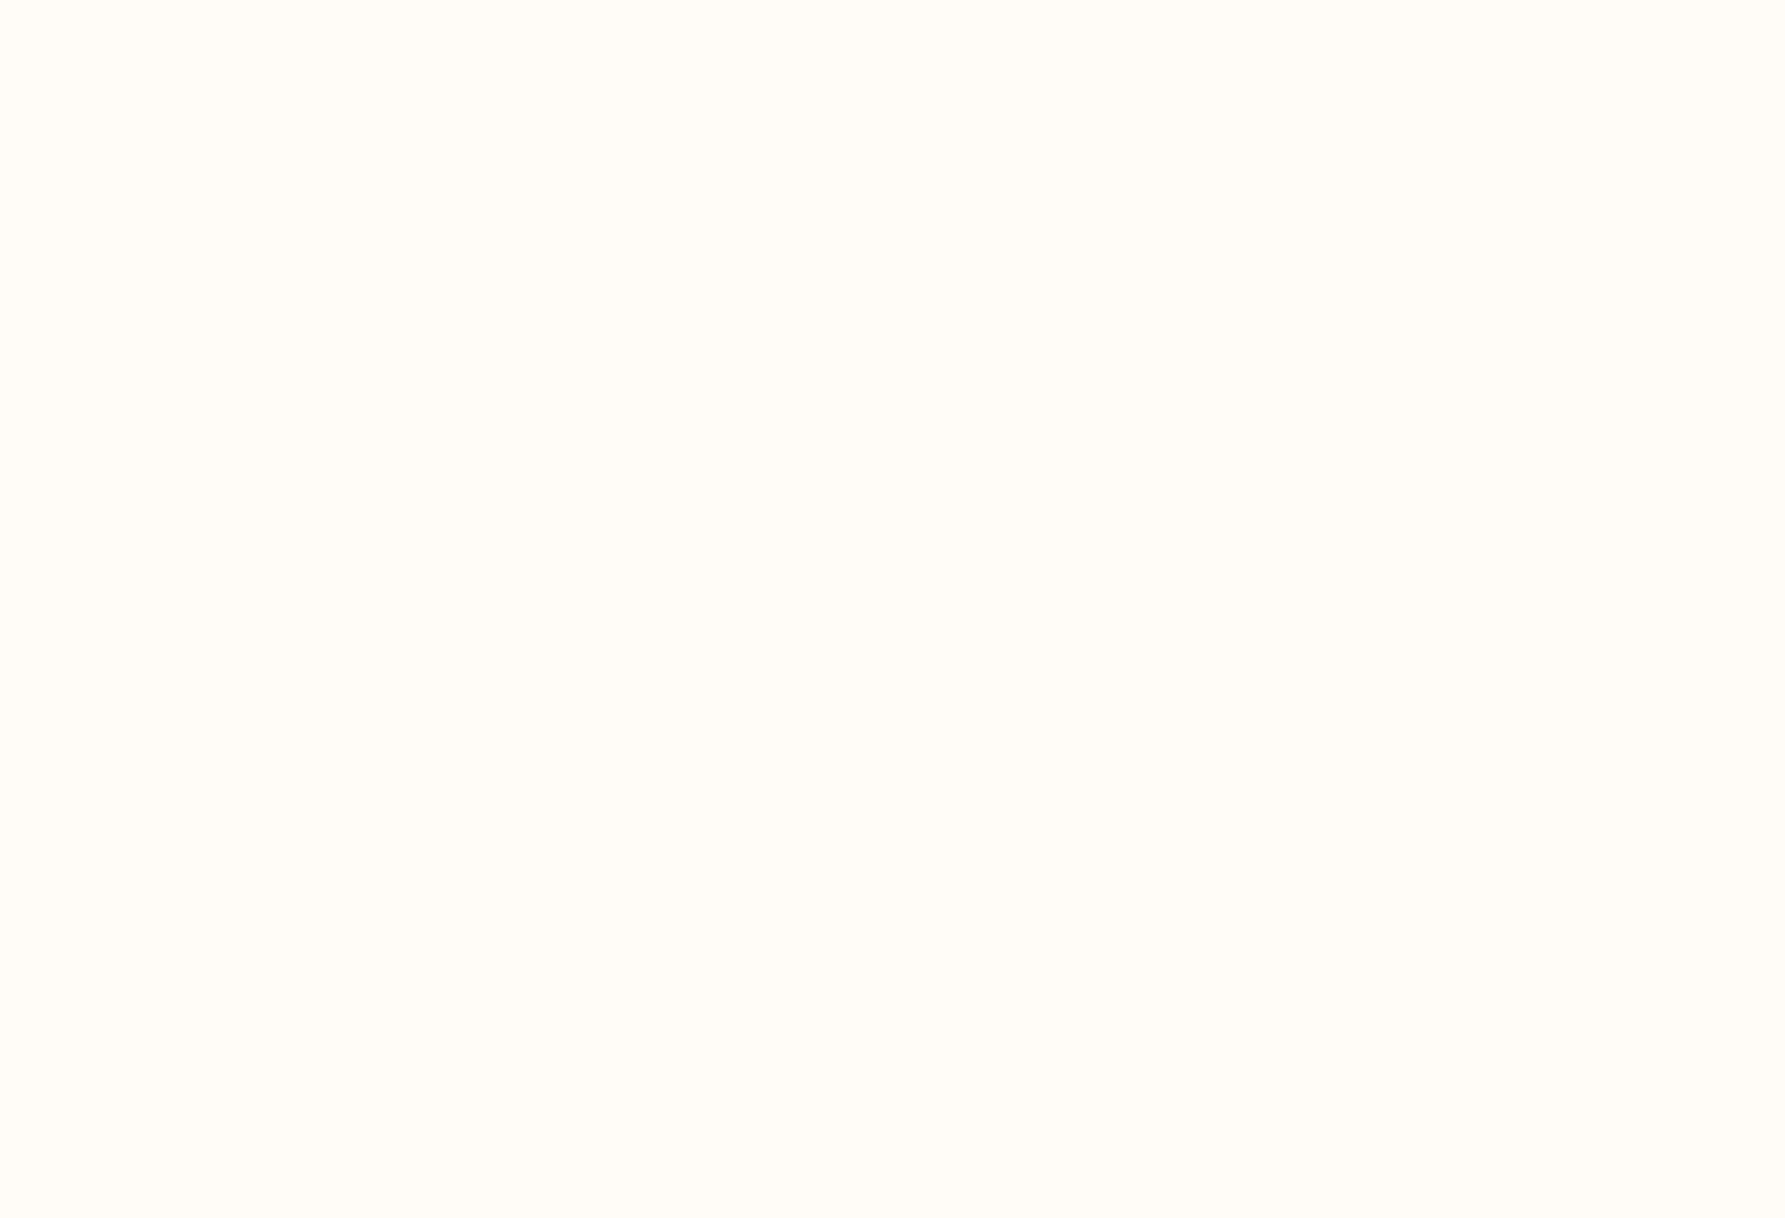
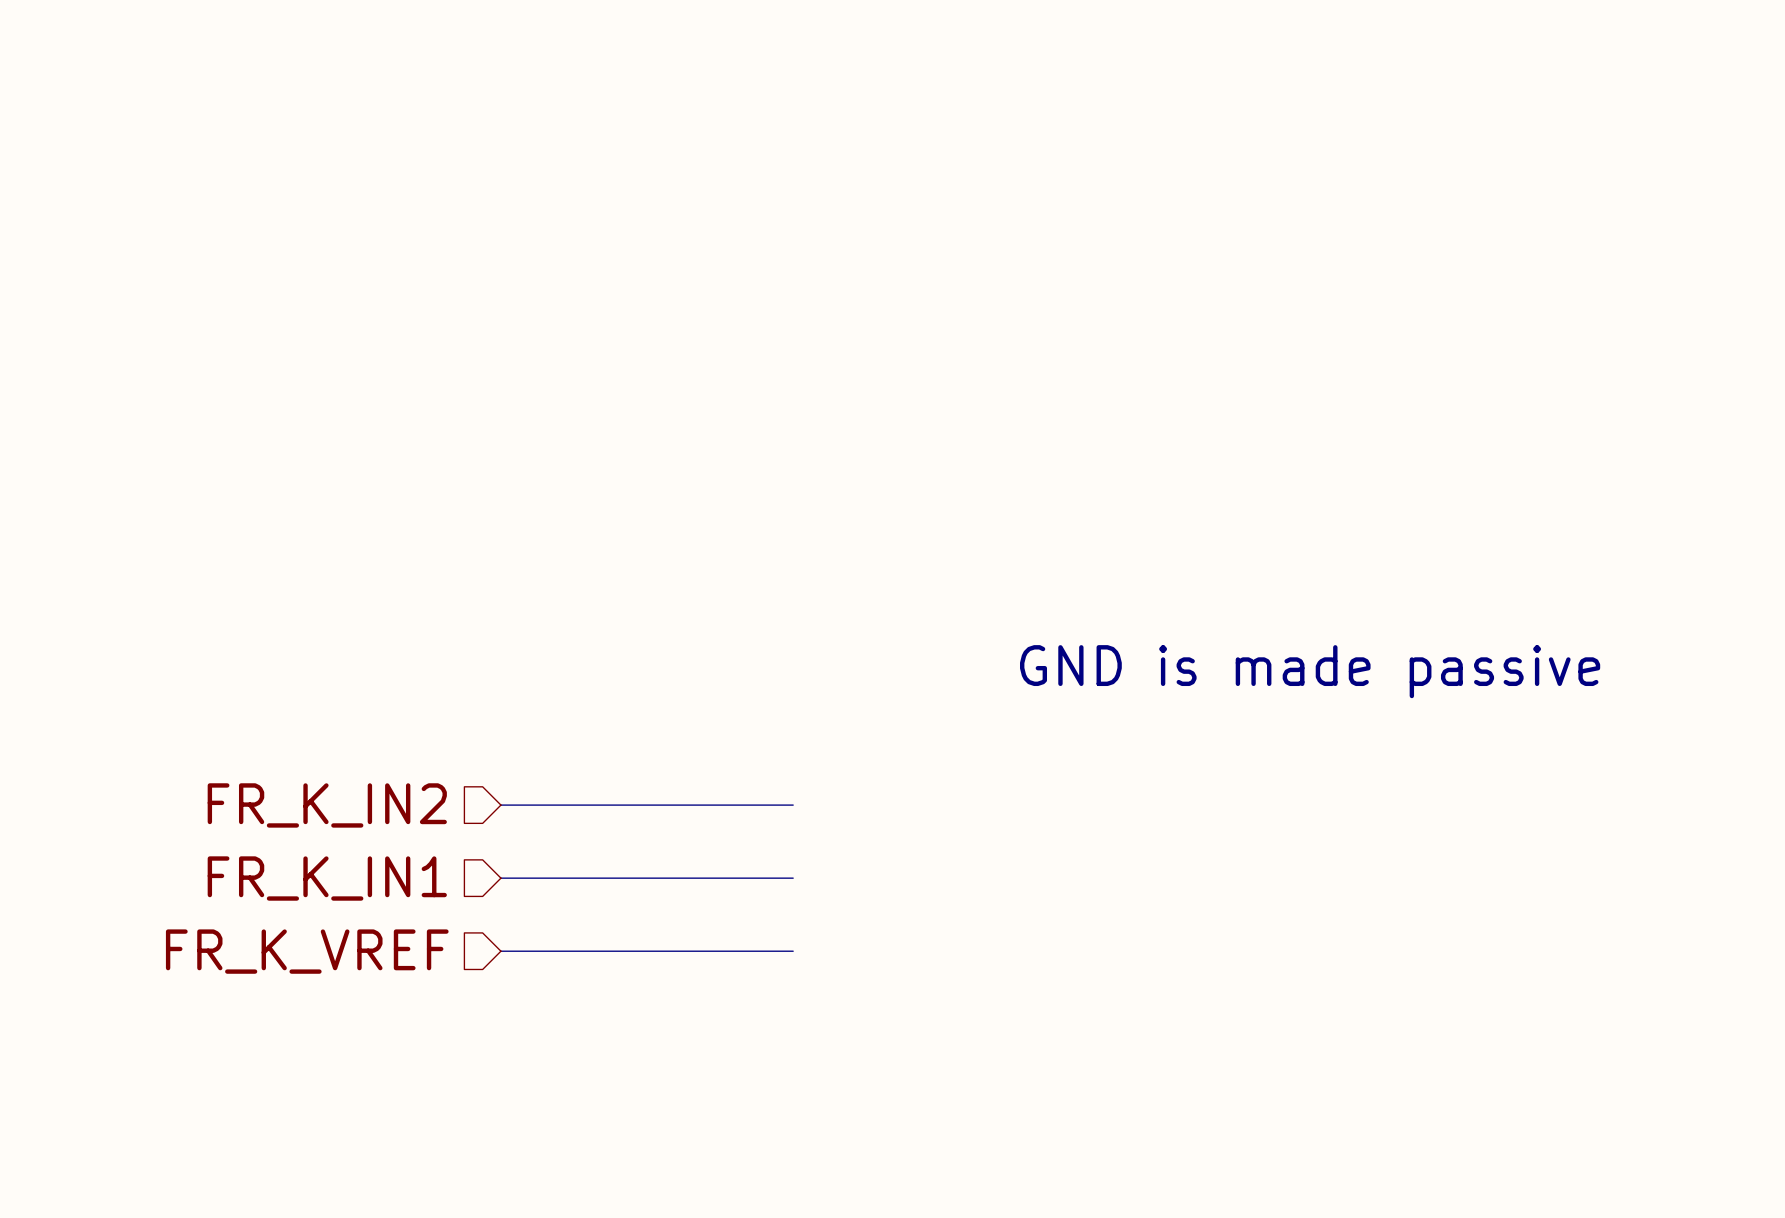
text: none -> GND is made passive (1310, 671)
hierarchical label: none -> FR_K_IN2 (327, 805)
wire: none -> (500, 805) (793, 805)
hierarchical label: none -> FR_K_IN1 (327, 878)
wire: none -> (500, 878) (793, 878)
hierarchical label: none -> FR_K_VREF (307, 951)
wire: none -> (500, 951) (793, 951)

